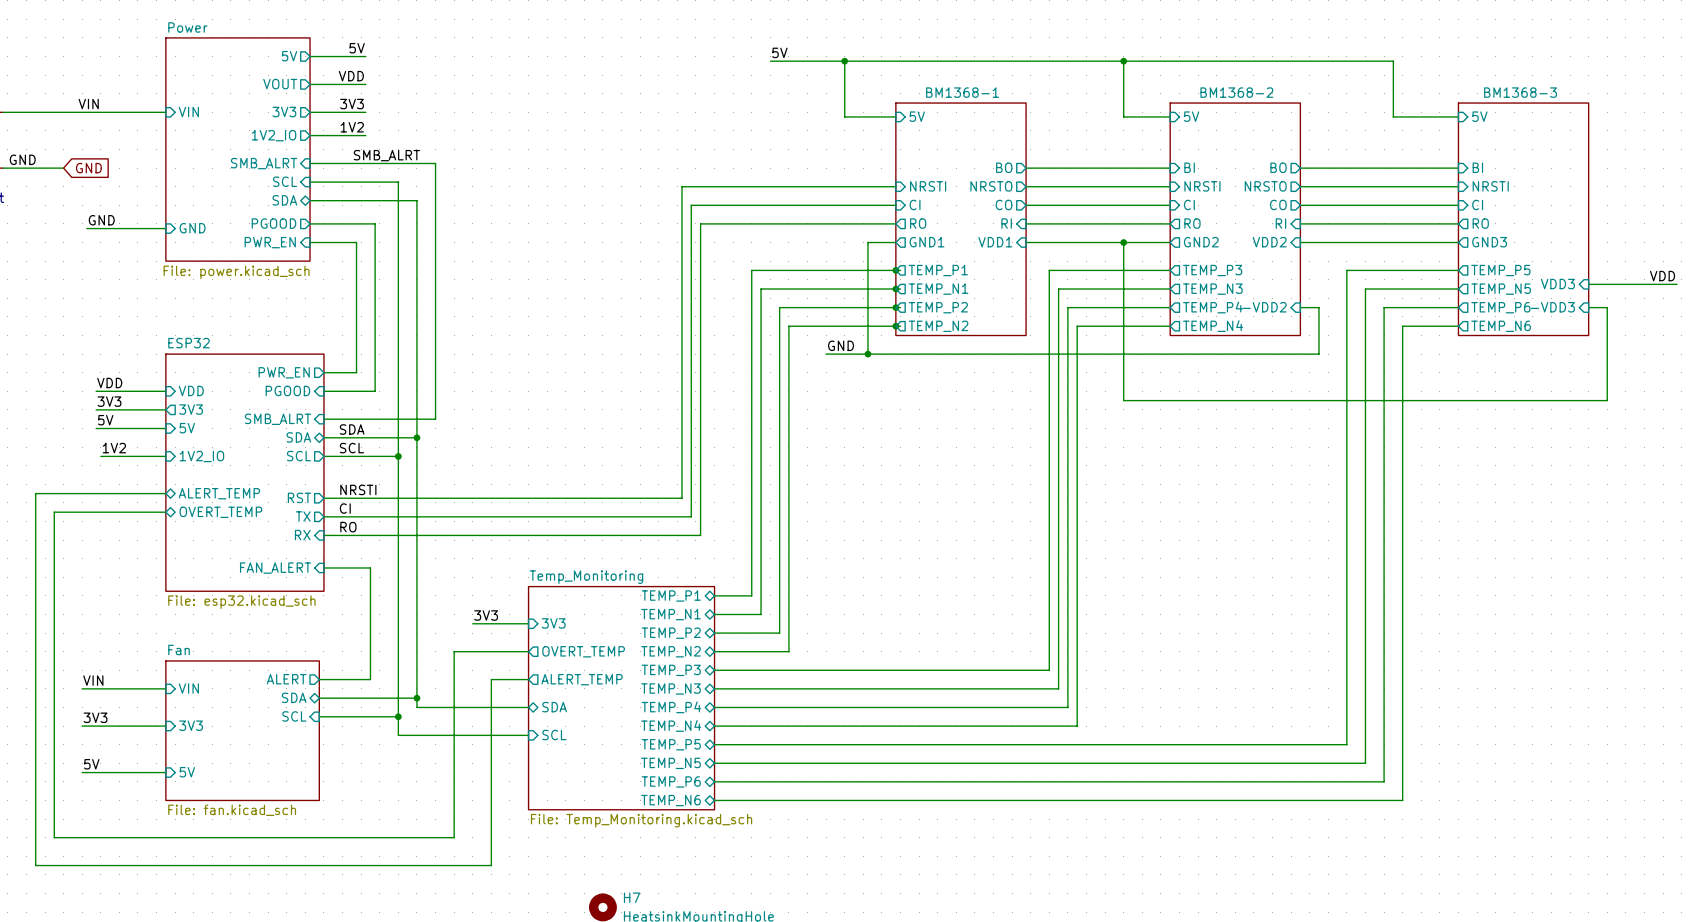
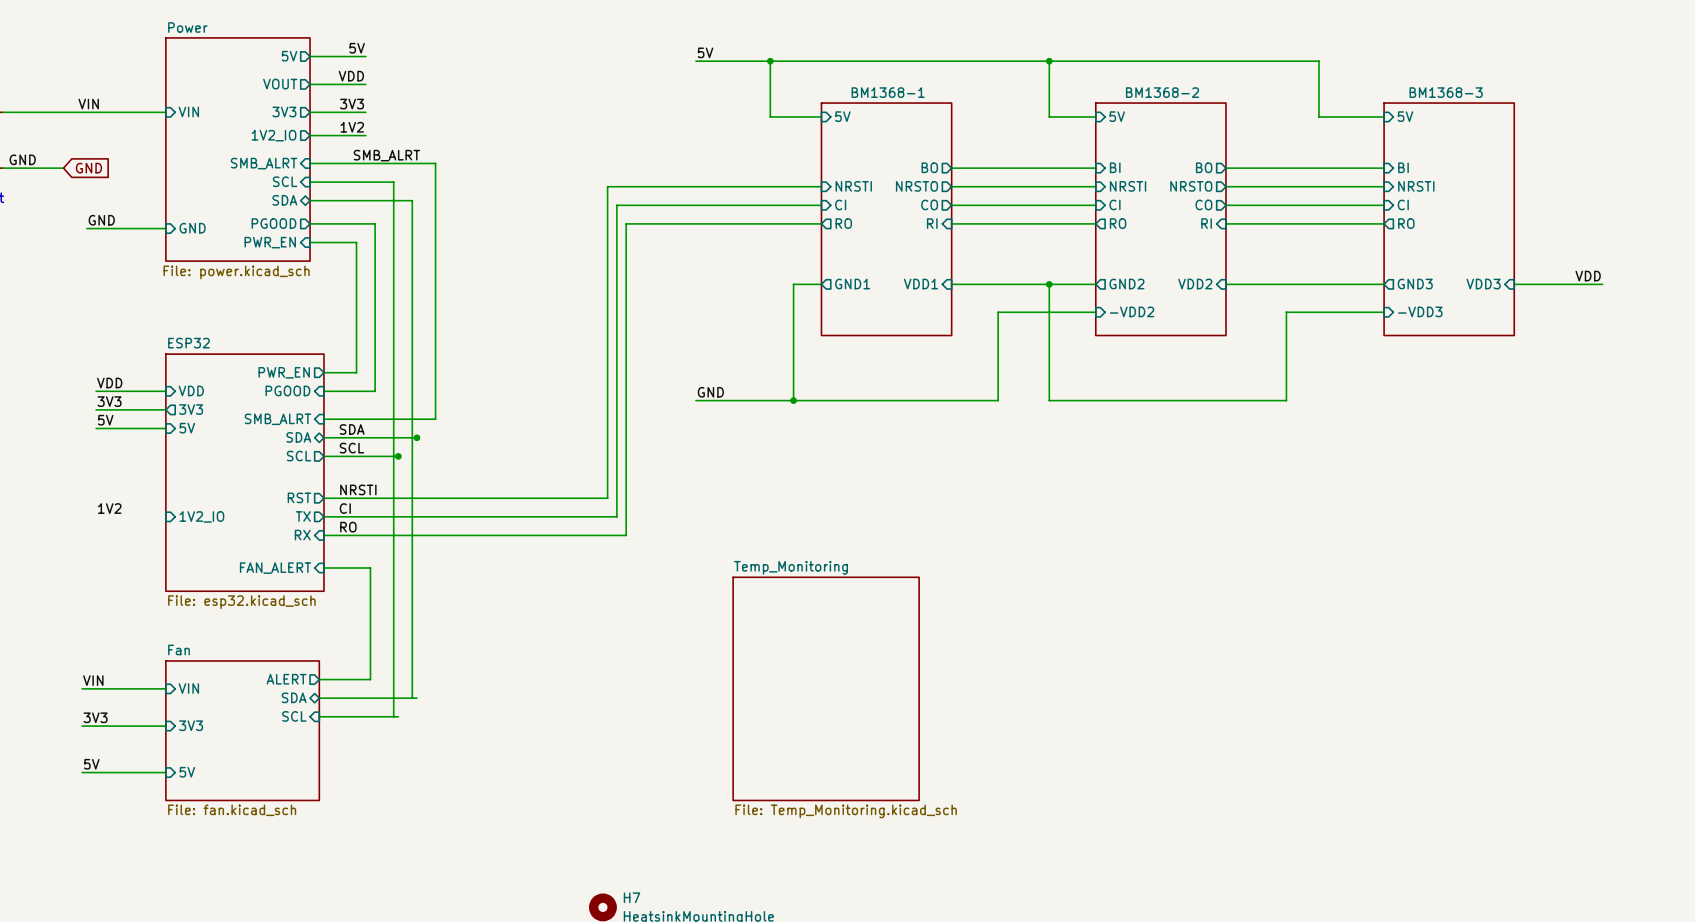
label position: 5V (779, 52) -> 5V (705, 52)
wire: none -> (695, 61) (770, 61) (770, 116) (821, 116)
junction: none -> (770, 61)
wire: (844, 61) (844, 116) (895, 116) -> none
junction: (844, 61) -> none
junction: none -> (1049, 61)
wire: (1123, 61) (1123, 116) (1170, 116) -> (1049, 61) (1049, 116) (1095, 116)
junction: (1123, 61) -> none
wire: (1318, 61) (1393, 61) (1393, 116) (1458, 116) -> (1318, 61) (1318, 116) (1384, 116)
sheet pin position: 5V (917, 116) -> 5V (842, 116)
sheet pin position: 5V (1191, 116) -> 5V (1117, 116)
sheet pin position: 5V (1479, 116) -> 5V (1405, 116)
sheet pin position: BO (1004, 167) -> BO (929, 167)
sheet pin position: BI (1189, 167) -> BI (1115, 167)
sheet pin position: BO (1278, 167) -> BO (1204, 167)
sheet pin position: BI (1477, 167) -> BI (1403, 167)
wire: none -> (951, 168) (1026, 168)
wire: (1095, 168) (1170, 168) -> (1225, 168) (1300, 168)
wire: (1384, 168) (1458, 168) -> none
wire: (393, 182) (398, 182) (398, 735) (528, 735) -> (393, 182) (393, 716)
wire: (681, 186) (681, 498) (607, 498) -> (681, 186) (607, 186) (607, 498)
wire: (821, 186) (895, 186) -> (951, 186) (1026, 186)
sheet pin position: NRSTI (928, 186) -> NRSTI (853, 186)
sheet pin position: NRSTO (991, 186) -> NRSTO (916, 186)
wire: (1095, 186) (1170, 186) -> (1225, 186) (1300, 186)
sheet pin position: NRSTI (1202, 186) -> NRSTI (1128, 186)
sheet pin position: NRSTO (1265, 186) -> NRSTO (1191, 186)
wire: (1384, 186) (1458, 186) -> none
sheet pin position: NRSTI (1490, 186) -> NRSTI (1416, 186)
wire: (412, 200) (416, 200) (416, 707) (528, 707) -> (412, 200) (412, 698)
sheet pin position: CI (915, 204) -> CI (840, 204)
sheet pin position: CO (1003, 204) -> CO (929, 204)
sheet pin position: CI (1189, 204) -> CI (1114, 204)
sheet pin position: CO (1278, 204) -> CO (1203, 204)
sheet pin position: CI (1477, 204) -> CI (1403, 204)
wire: (691, 205) (691, 516) (616, 516) -> (691, 205) (616, 205) (616, 516)
wire: (821, 205) (895, 205) -> (951, 205) (1026, 205)
wire: (1095, 205) (1170, 205) -> (1225, 205) (1300, 205)
wire: (1384, 205) (1458, 205) -> none
sheet BM1368-1 position: (960, 219) -> (886, 219)
sheet BM1368-2 position: (1235, 219) -> (1160, 219)
sheet BM1368-3 position: (1523, 219) -> (1449, 219)
wire: (700, 223) (700, 535) (626, 535) -> (700, 223) (626, 223) (626, 535)
wire: (821, 223) (895, 223) -> (951, 223) (1026, 223)
sheet pin position: RO (918, 223) -> RO (843, 223)
sheet pin position: RI (1006, 223) -> RI (932, 223)
wire: (1095, 223) (1170, 223) -> (1225, 223) (1300, 223)
sheet pin position: RO (1192, 223) -> RO (1118, 223)
sheet pin position: RI (1280, 223) -> RI (1206, 223)
wire: (1384, 223) (1458, 223) -> none
sheet pin position: RO (1480, 223) -> RO (1406, 223)
wire: (895, 242) (867, 242) (867, 354) -> none
sheet pin position: GND1 (927, 242) -> GND1 (852, 284)
sheet pin position: VDD1 (995, 242) -> VDD1 (920, 284)
wire: (1026, 242) (1170, 242) -> (951, 284) (1095, 284)
wire: (1123, 242) (1123, 400) -> (1049, 400) (1123, 400)
junction: (1123, 242) -> none
sheet pin position: GND2 (1201, 242) -> GND2 (1126, 284)
sheet pin position: VDD2 (1269, 242) -> VDD2 (1195, 284)
wire: (1300, 242) (1458, 242) -> (1225, 284) (1384, 284)
sheet pin position: GND3 (1489, 242) -> GND3 (1415, 284)
junction: (895, 270) -> none
wire: (900, 270) (751, 270) (751, 595) (714, 595) -> none
sheet pin: TEMP_P1 (938, 270) -> none
wire: (1170, 270) (1049, 270) (1049, 284) -> none
sheet pin: TEMP_P3 (1212, 270) -> none
wire: (1458, 270) (1346, 270) (1346, 744) (714, 744) -> none
sheet pin: TEMP_P5 (1500, 270) -> none
label position: VDD (1662, 276) -> VDD (1588, 276)
wire: none -> (821, 284) (793, 284) (793, 400)
junction: none -> (1049, 284)
sheet pin position: VDD3 (1557, 284) -> VDD3 (1483, 284)
wire: (1602, 284) (1676, 284) -> (1514, 284) (1588, 284)
junction: (895, 289) -> none
wire: (900, 289) (761, 289) (761, 614) (714, 614) -> none
sheet pin: TEMP_N1 (938, 289) -> none
wire: (1170, 289) (1058, 289) (1058, 688) (714, 688) -> none
sheet pin: TEMP_N3 (1212, 289) -> none
wire: (1458, 289) (1365, 289) (1365, 763) (714, 763) -> none
sheet pin: TEMP_N5 (1501, 289) -> none
junction: (895, 307) -> none
wire: (900, 307) (779, 307) (779, 633) (714, 633) -> none
sheet pin: TEMP_P2 (938, 307) -> none
wire: (1170, 307) (1067, 307) (1067, 707) (714, 707) -> none
sheet pin: TEMP_P4 (1212, 307) -> none
sheet pin rotation: 0° (1264, 307) -> 180° (1132, 311)
sheet pin position: -VDD2 (1264, 307) -> -VDD2 (1132, 311)
wire: (1300, 307) (1318, 307) (1318, 354) (826, 354) -> none
wire: (1458, 307) (1384, 307) (1384, 781) (714, 781) -> none
sheet pin: TEMP_P6 (1500, 307) -> none
sheet pin rotation: 0° (1552, 307) -> 180° (1420, 311)
sheet pin position: -VDD3 (1552, 307) -> -VDD3 (1420, 311)
wire: (1588, 307) (1607, 307) (1607, 400) (1286, 400) -> (1384, 312) (1286, 312) (1286, 400)
wire: none -> (1095, 312) (998, 312) (998, 400) (695, 400)
junction: (895, 326) -> none
wire: (900, 326) (788, 326) (788, 651) (714, 651) -> none
sheet pin: TEMP_N2 (938, 326) -> none
wire: (1170, 326) (1077, 326) (1077, 726) (714, 726) -> none
sheet pin: TEMP_N4 (1213, 326) -> none
wire: (1458, 326) (1402, 326) (1402, 800) (714, 800) -> none
sheet pin: TEMP_N6 (1501, 326) -> none
label position: GND (841, 345) -> GND (710, 392)
junction: (867, 354) -> none
junction: none -> (793, 400)
wire: (1049, 400) (1049, 670) (714, 670) -> none
label position: 1V2 (114, 448) -> 1V2 (109, 508)
wire: (100, 456) (165, 456) -> none
sheet pin position: 1V2_IO (201, 456) -> 1V2_IO (201, 516)
wire: (165, 493) (35, 493) (35, 865) (491, 865) (491, 679) (528, 679) -> none
sheet pin: ALERT_TEMP (219, 493) -> none
wire: (165, 512) (54, 512) (54, 837) (454, 837) (454, 651) (528, 651) -> none
sheet pin: OVERT_TEMP (220, 512) -> none
sheet pin: TEMP_P1 (671, 595) -> none
sheet pin: TEMP_N1 (670, 614) -> none
label: 3V3 (486, 615) -> none
wire: (472, 623) (528, 623) -> none
sheet pin: 3V3 (553, 623) -> none
sheet pin: TEMP_P2 (671, 633) -> none
sheet pin: OVERT_TEMP (583, 651) -> none
sheet pin: TEMP_N2 (670, 651) -> none
sheet pin: TEMP_P3 (671, 670) -> none
sheet pin: ALERT_TEMP (582, 679) -> none
sheet pin: TEMP_N3 (670, 688) -> none
sheet Temp_Monitoring: none -> File: Temp_Monitoring.kicad_sch (826, 688)
junction: (416, 698) -> none
sheet Temp_Monitoring: File: Temp_Monitoring.kicad_sch (621, 698) -> none
sheet pin: SDA (554, 707) -> none
sheet pin: TEMP_P4 (671, 707) -> none
junction: (398, 716) -> none
sheet pin: TEMP_N4 (671, 725) -> none
sheet pin: SCL (554, 735) -> none
sheet pin: TEMP_P5 (671, 744) -> none
sheet pin: TEMP_N5 (670, 763) -> none
sheet pin: TEMP_P6 (671, 781) -> none
sheet pin: TEMP_N6 (670, 800) -> none

